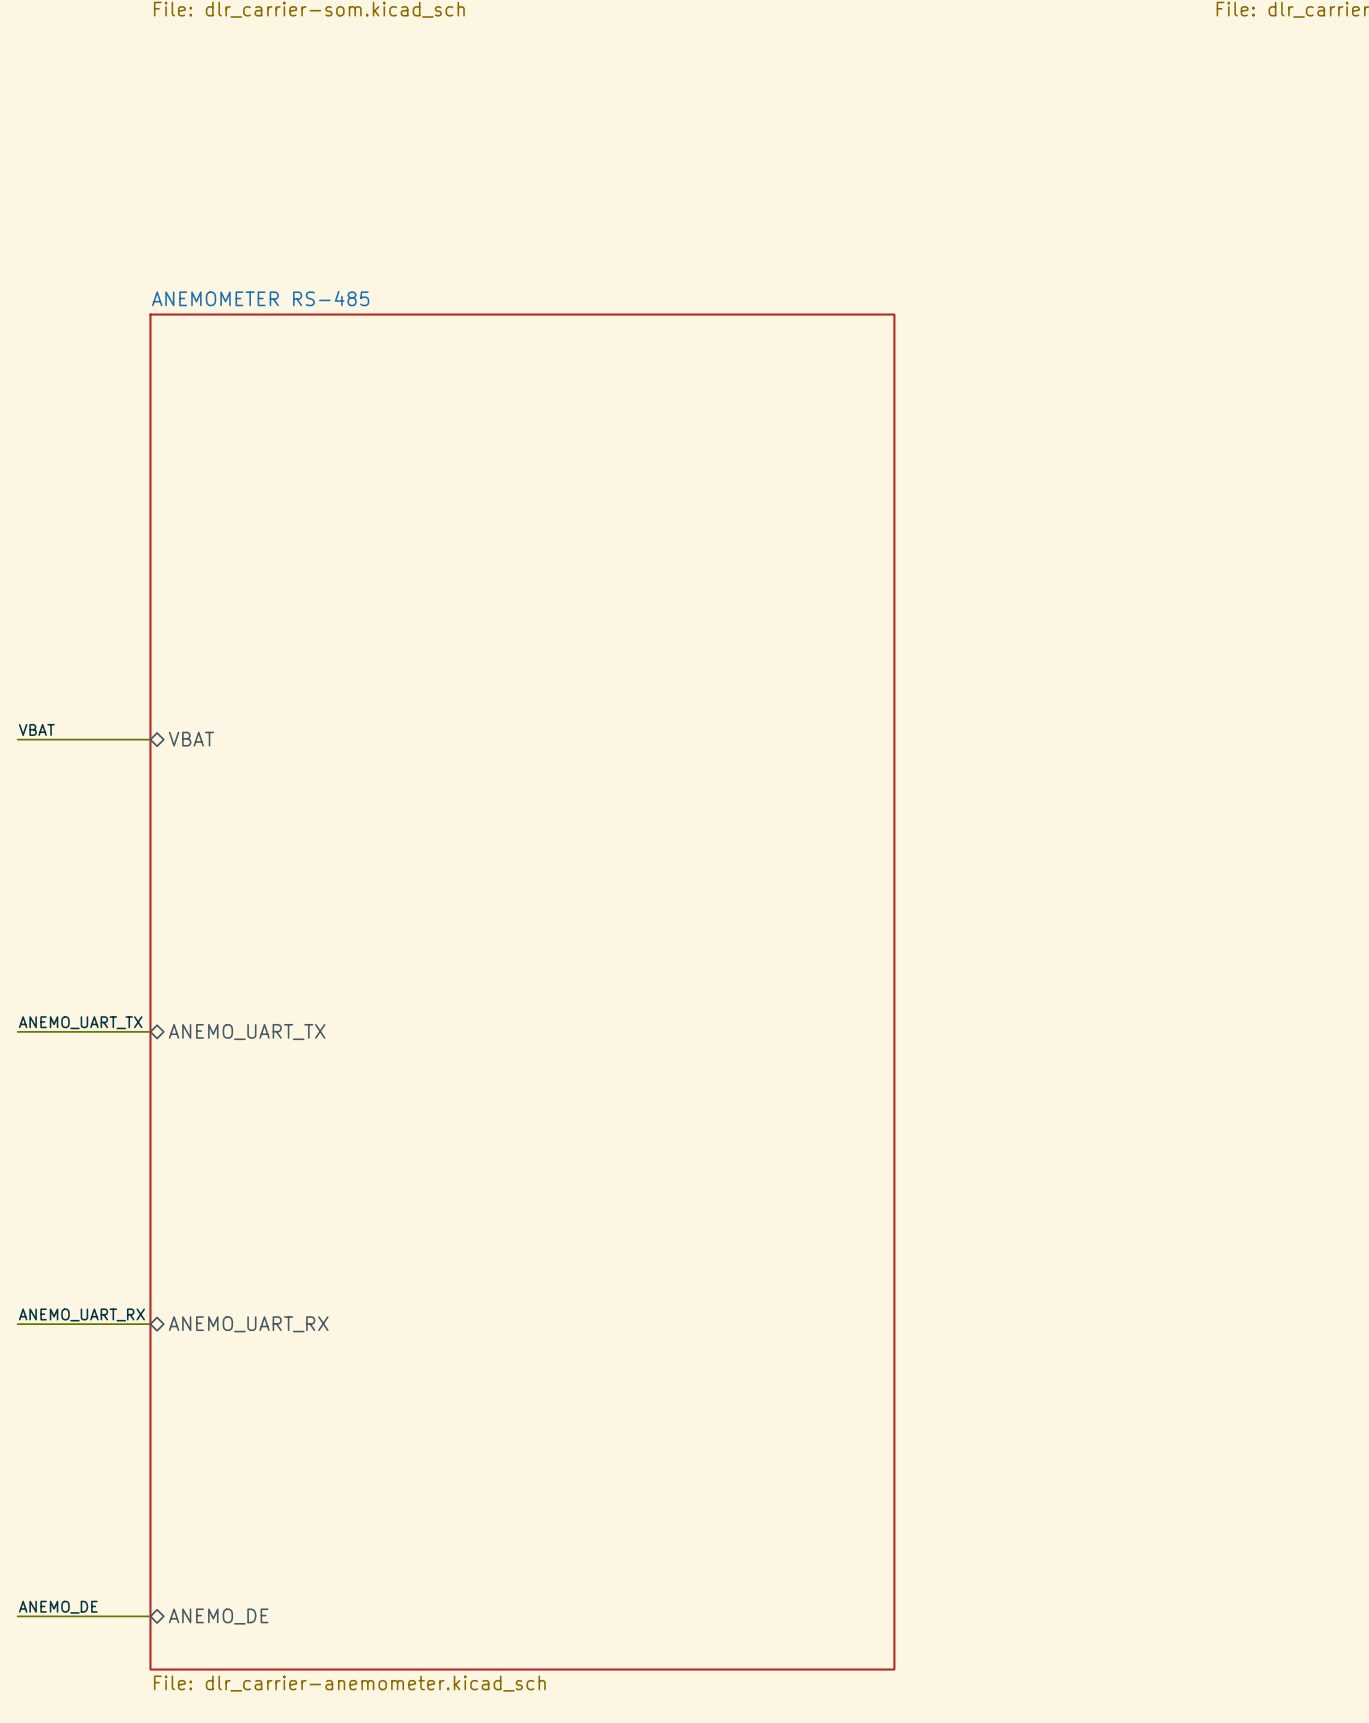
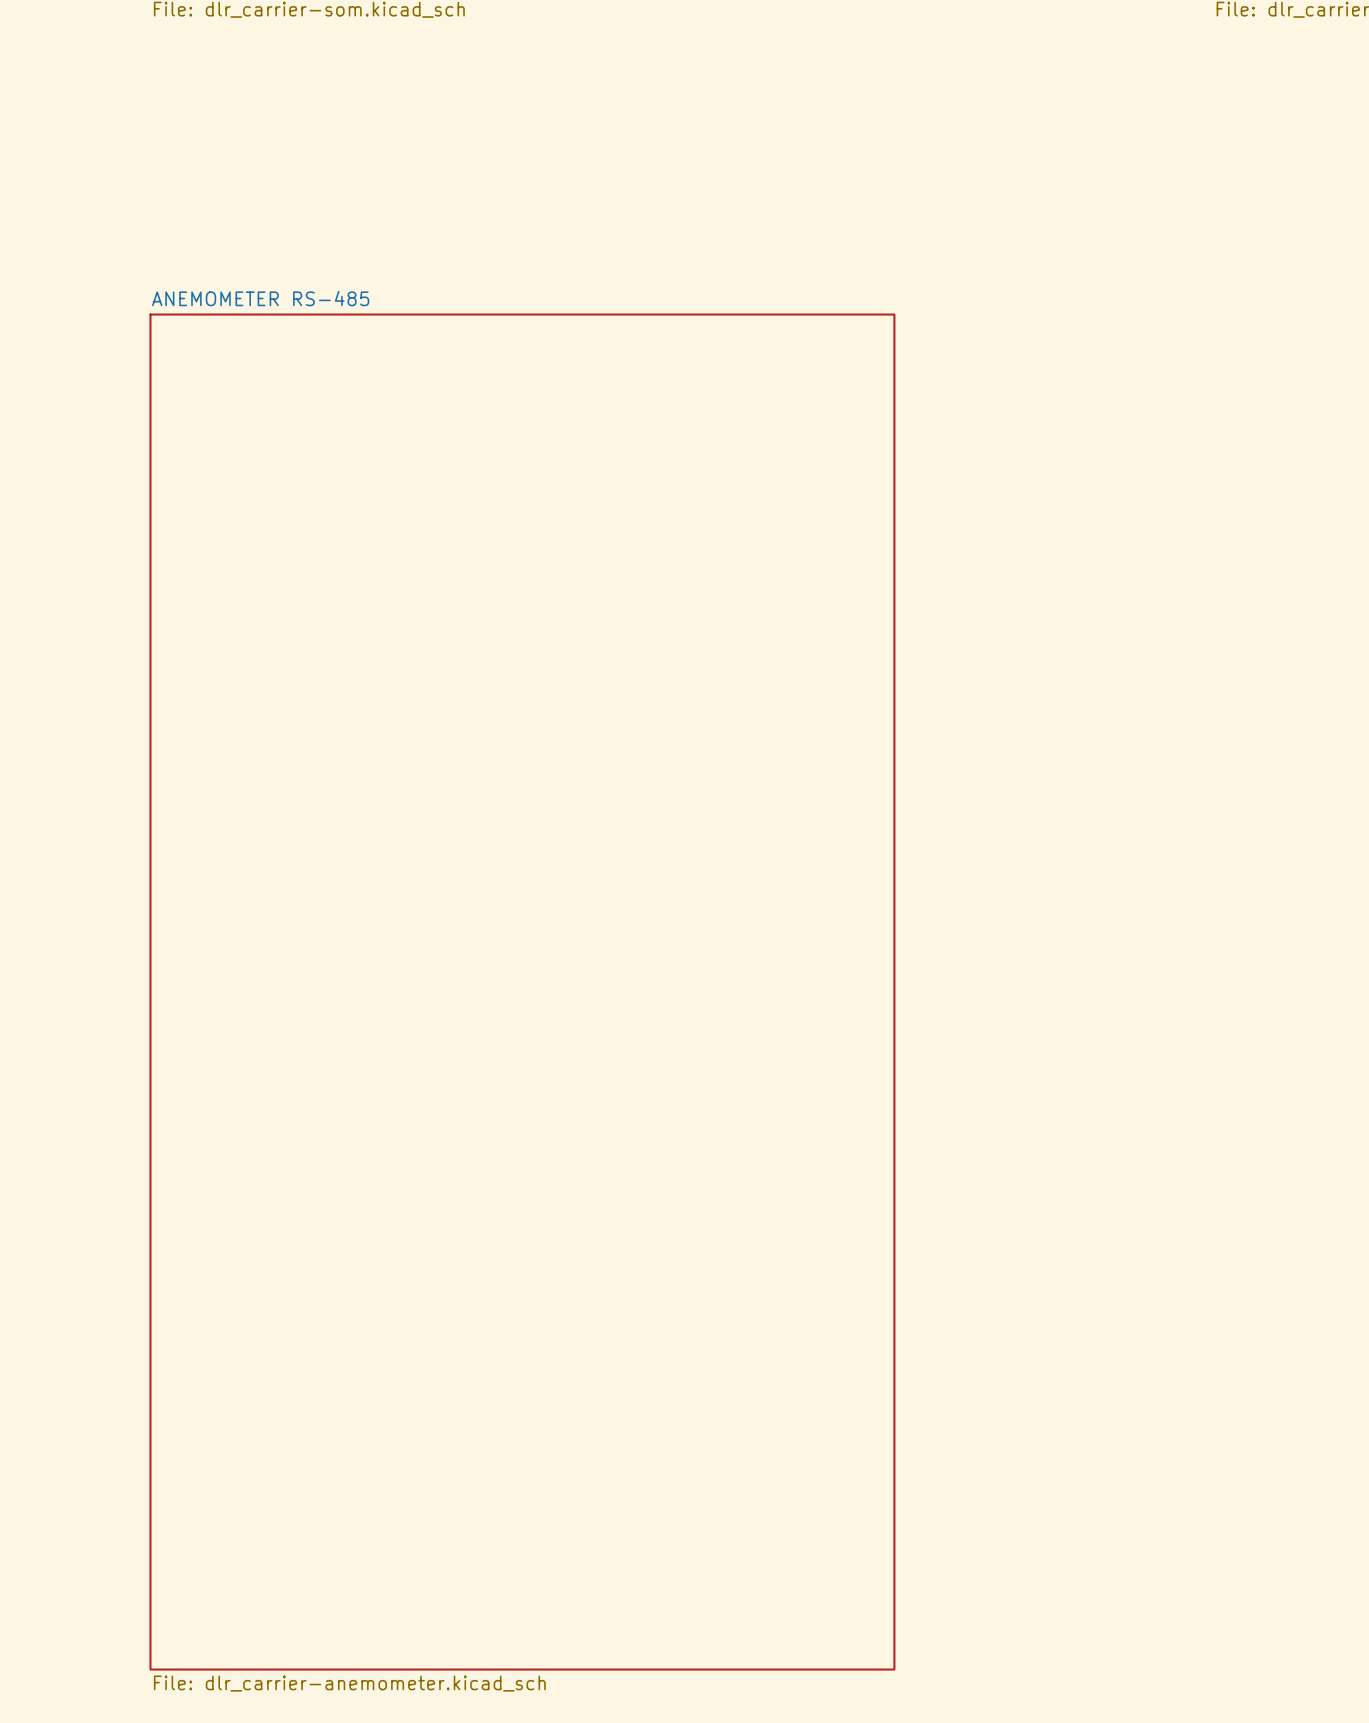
label: VBAT (36, 729) -> none
wire: (17, 739) (150, 739) -> none
sheet pin: VBAT (191, 739) -> none
label: ANEMO_UART_TX (80, 1022) -> none
wire: (17, 1031) (150, 1031) -> none
sheet pin: ANEMO_UART_TX (247, 1032) -> none
label: ANEMO_UART_RX (81, 1314) -> none
wire: (17, 1324) (150, 1324) -> none
sheet pin: ANEMO_UART_RX (248, 1324) -> none
label: ANEMO_DE (58, 1607) -> none
wire: (17, 1616) (150, 1616) -> none
sheet pin: ANEMO_DE (218, 1616) -> none

